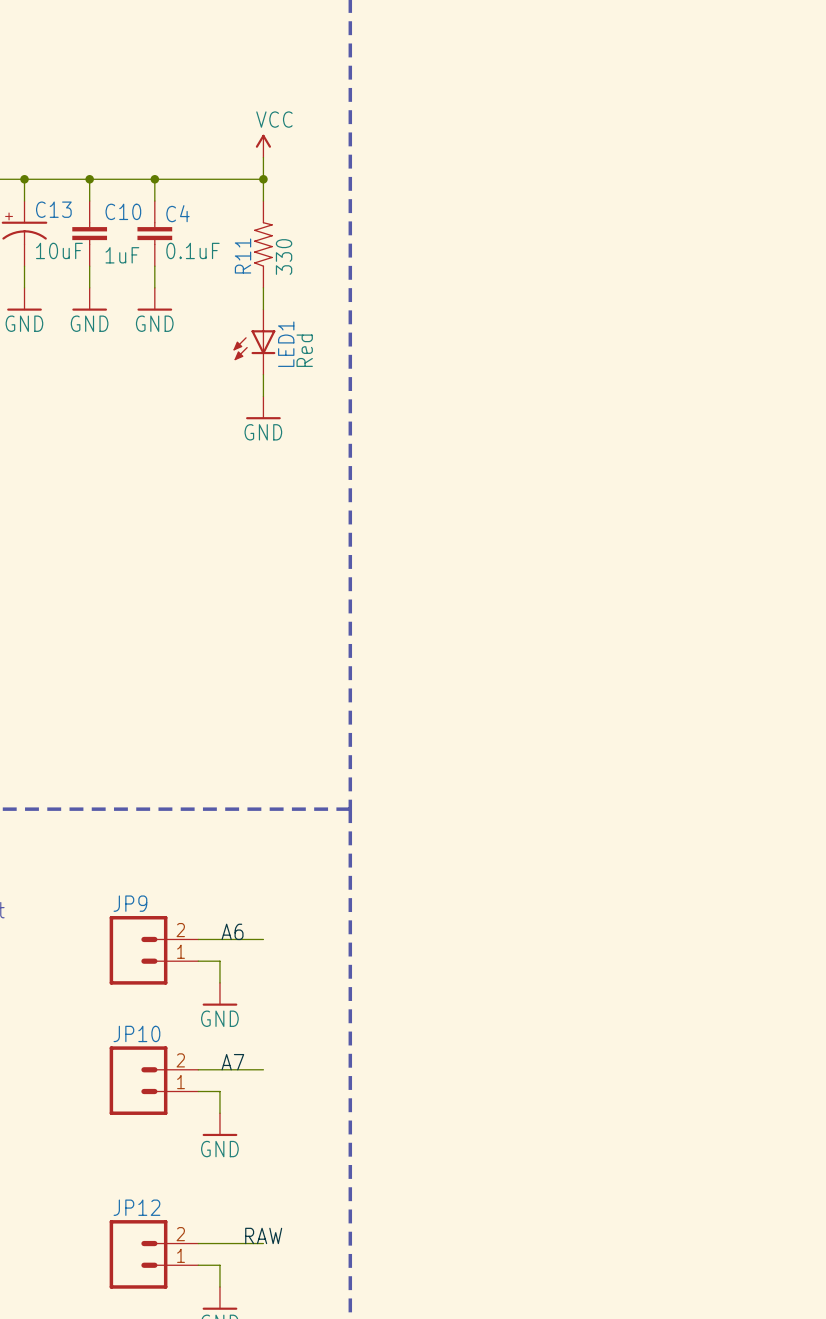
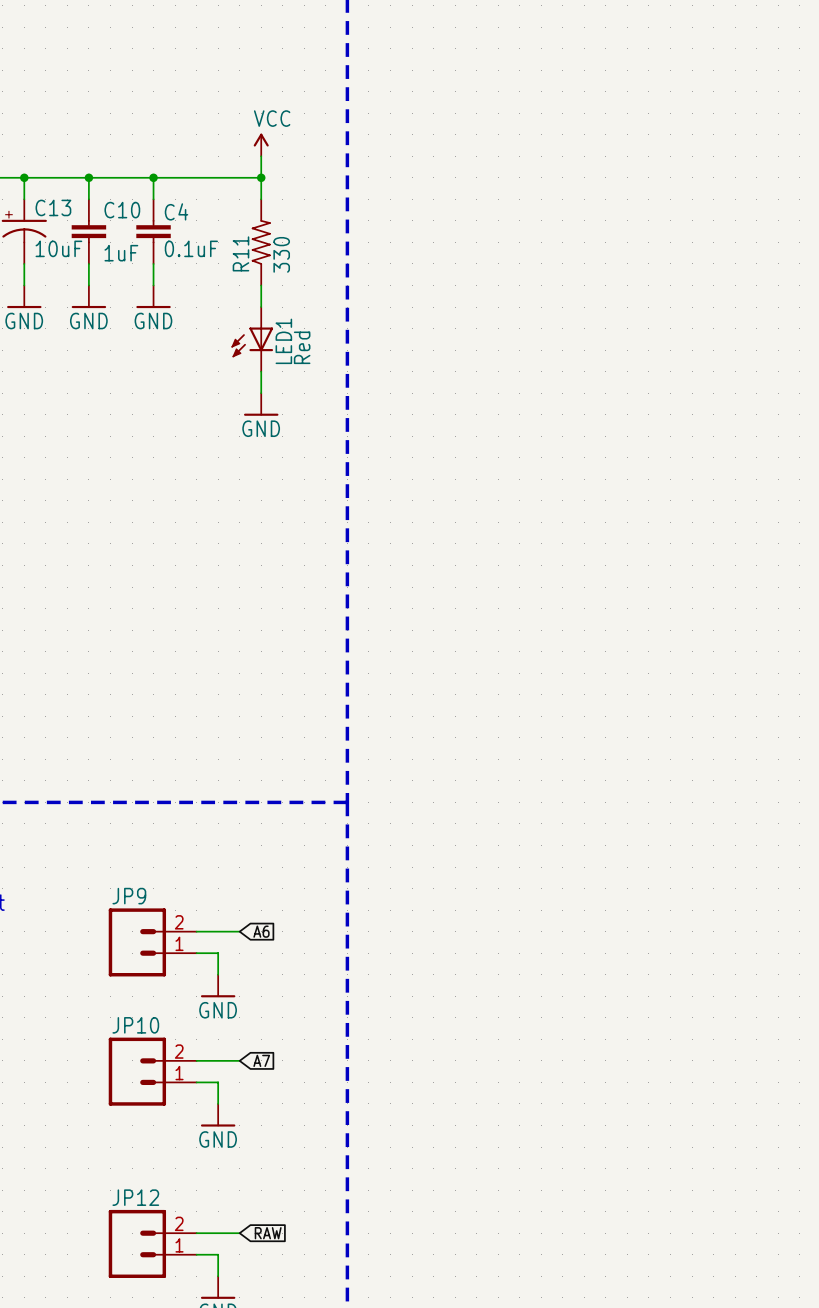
label: A6 (232, 931) -> none
wire: (241, 939) (263, 939) -> none
global label: none -> A6 (261, 931)
label: A7 (232, 1062) -> none
wire: (241, 1069) (263, 1069) -> none
global label: none -> A7 (261, 1060)
label: RAW (263, 1235) -> none
wire: (241, 1243) (263, 1243) -> none
global label: none -> RAW (268, 1233)

